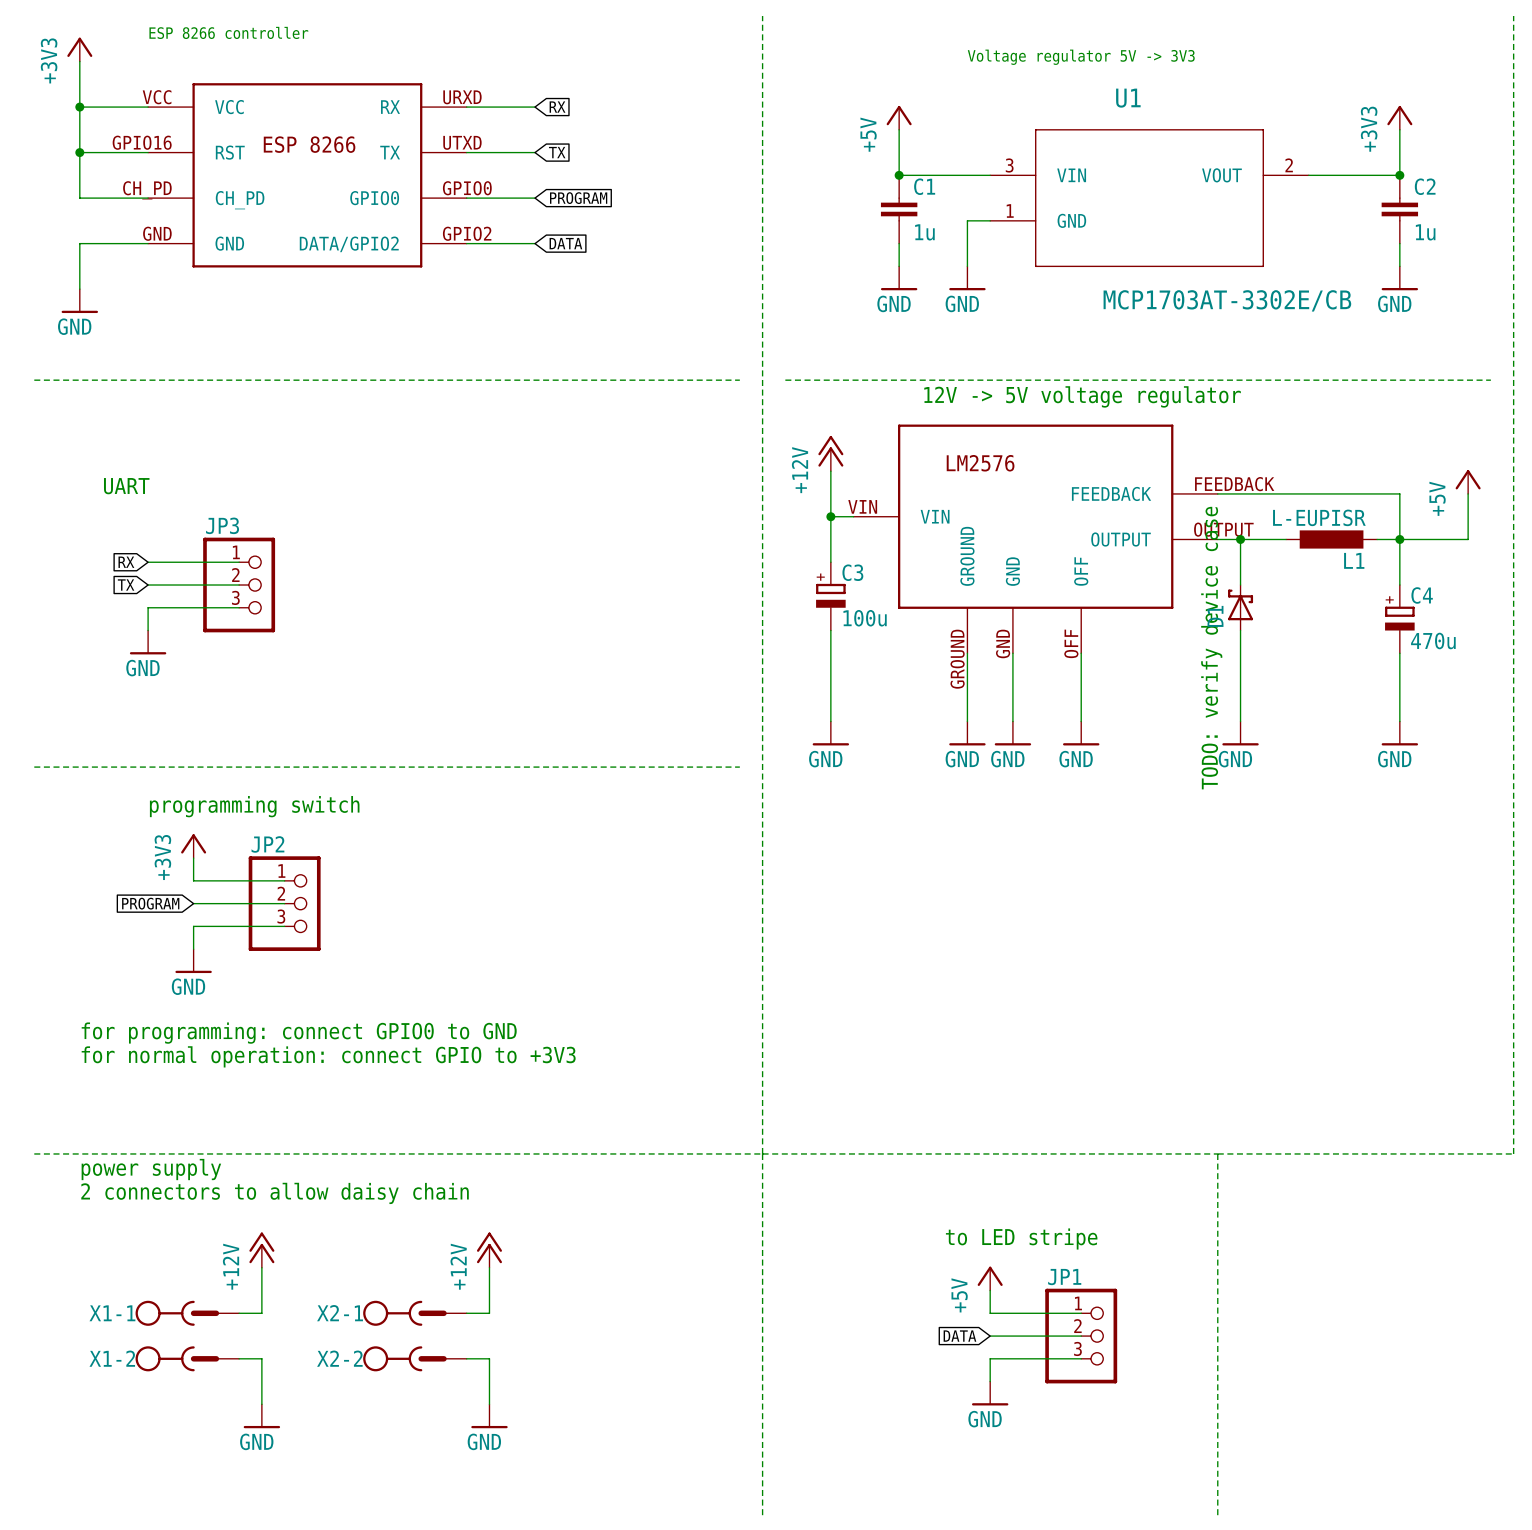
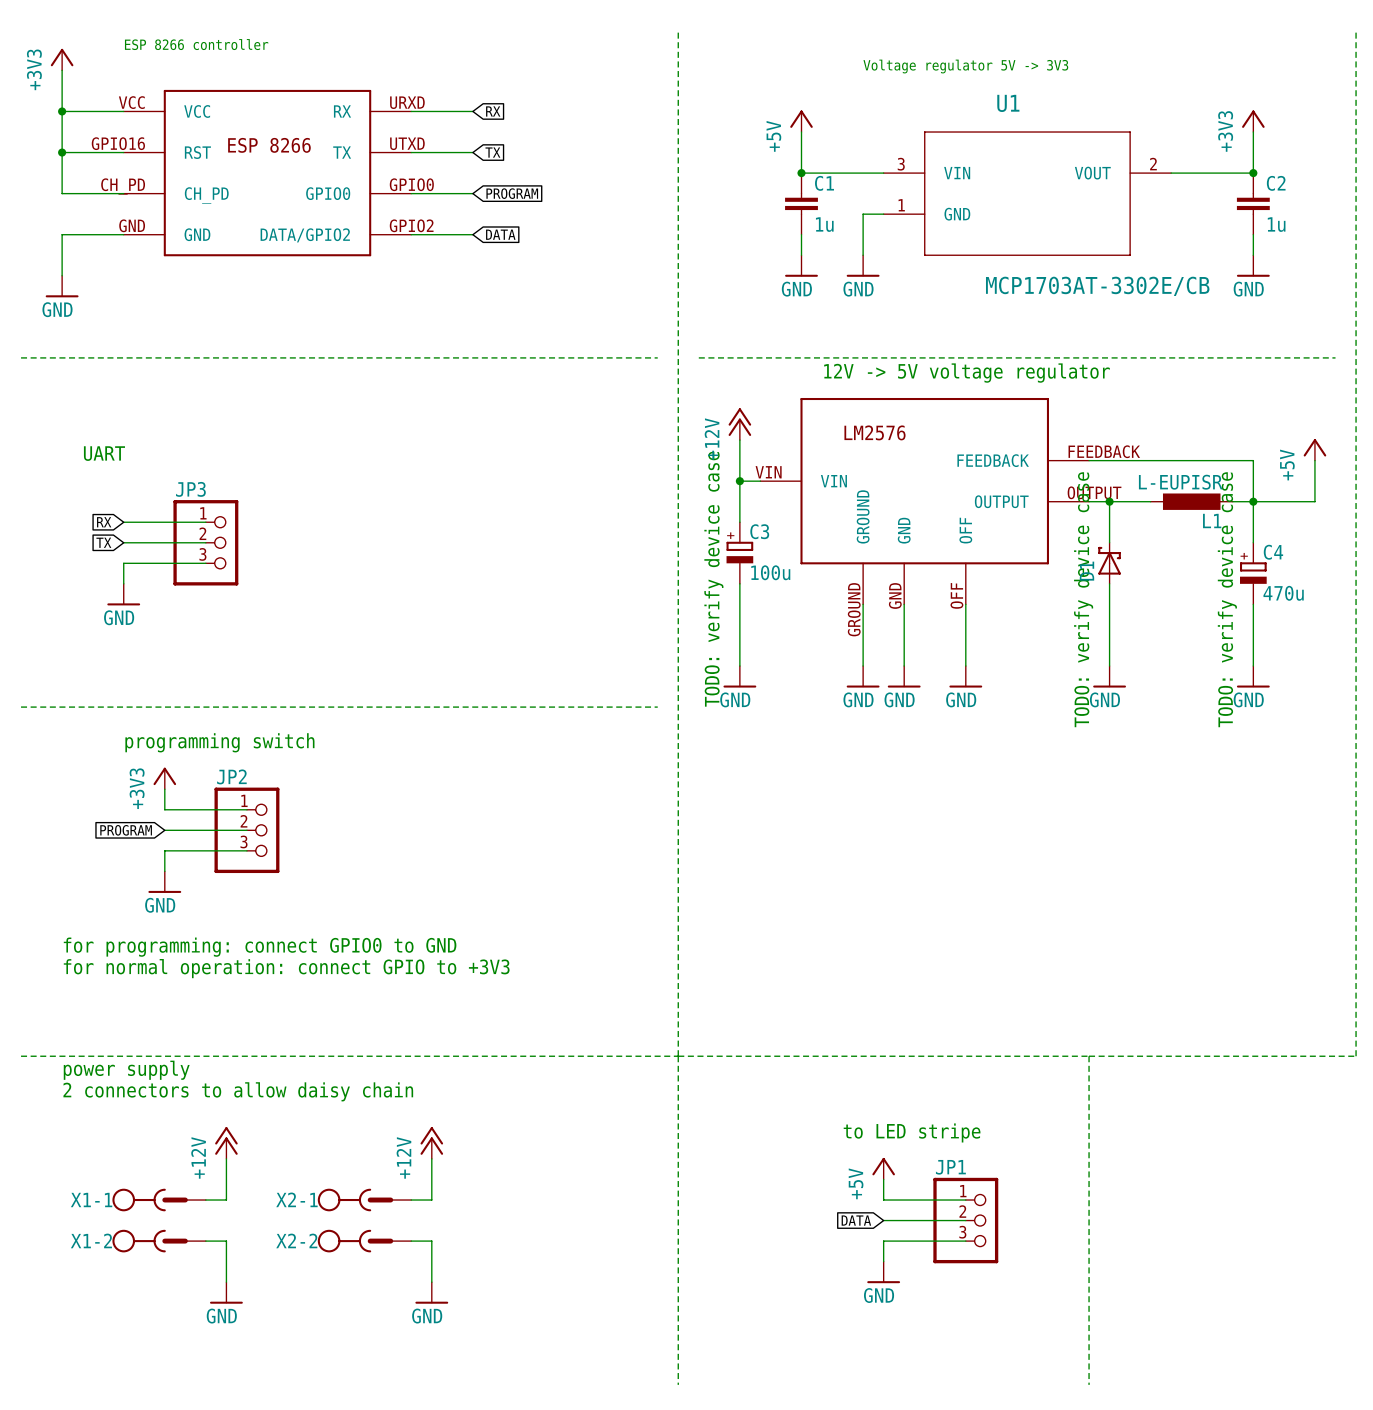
text: none -> TODO: verify device case (713, 579)
text: none -> TODO: verify device case (1227, 599)

